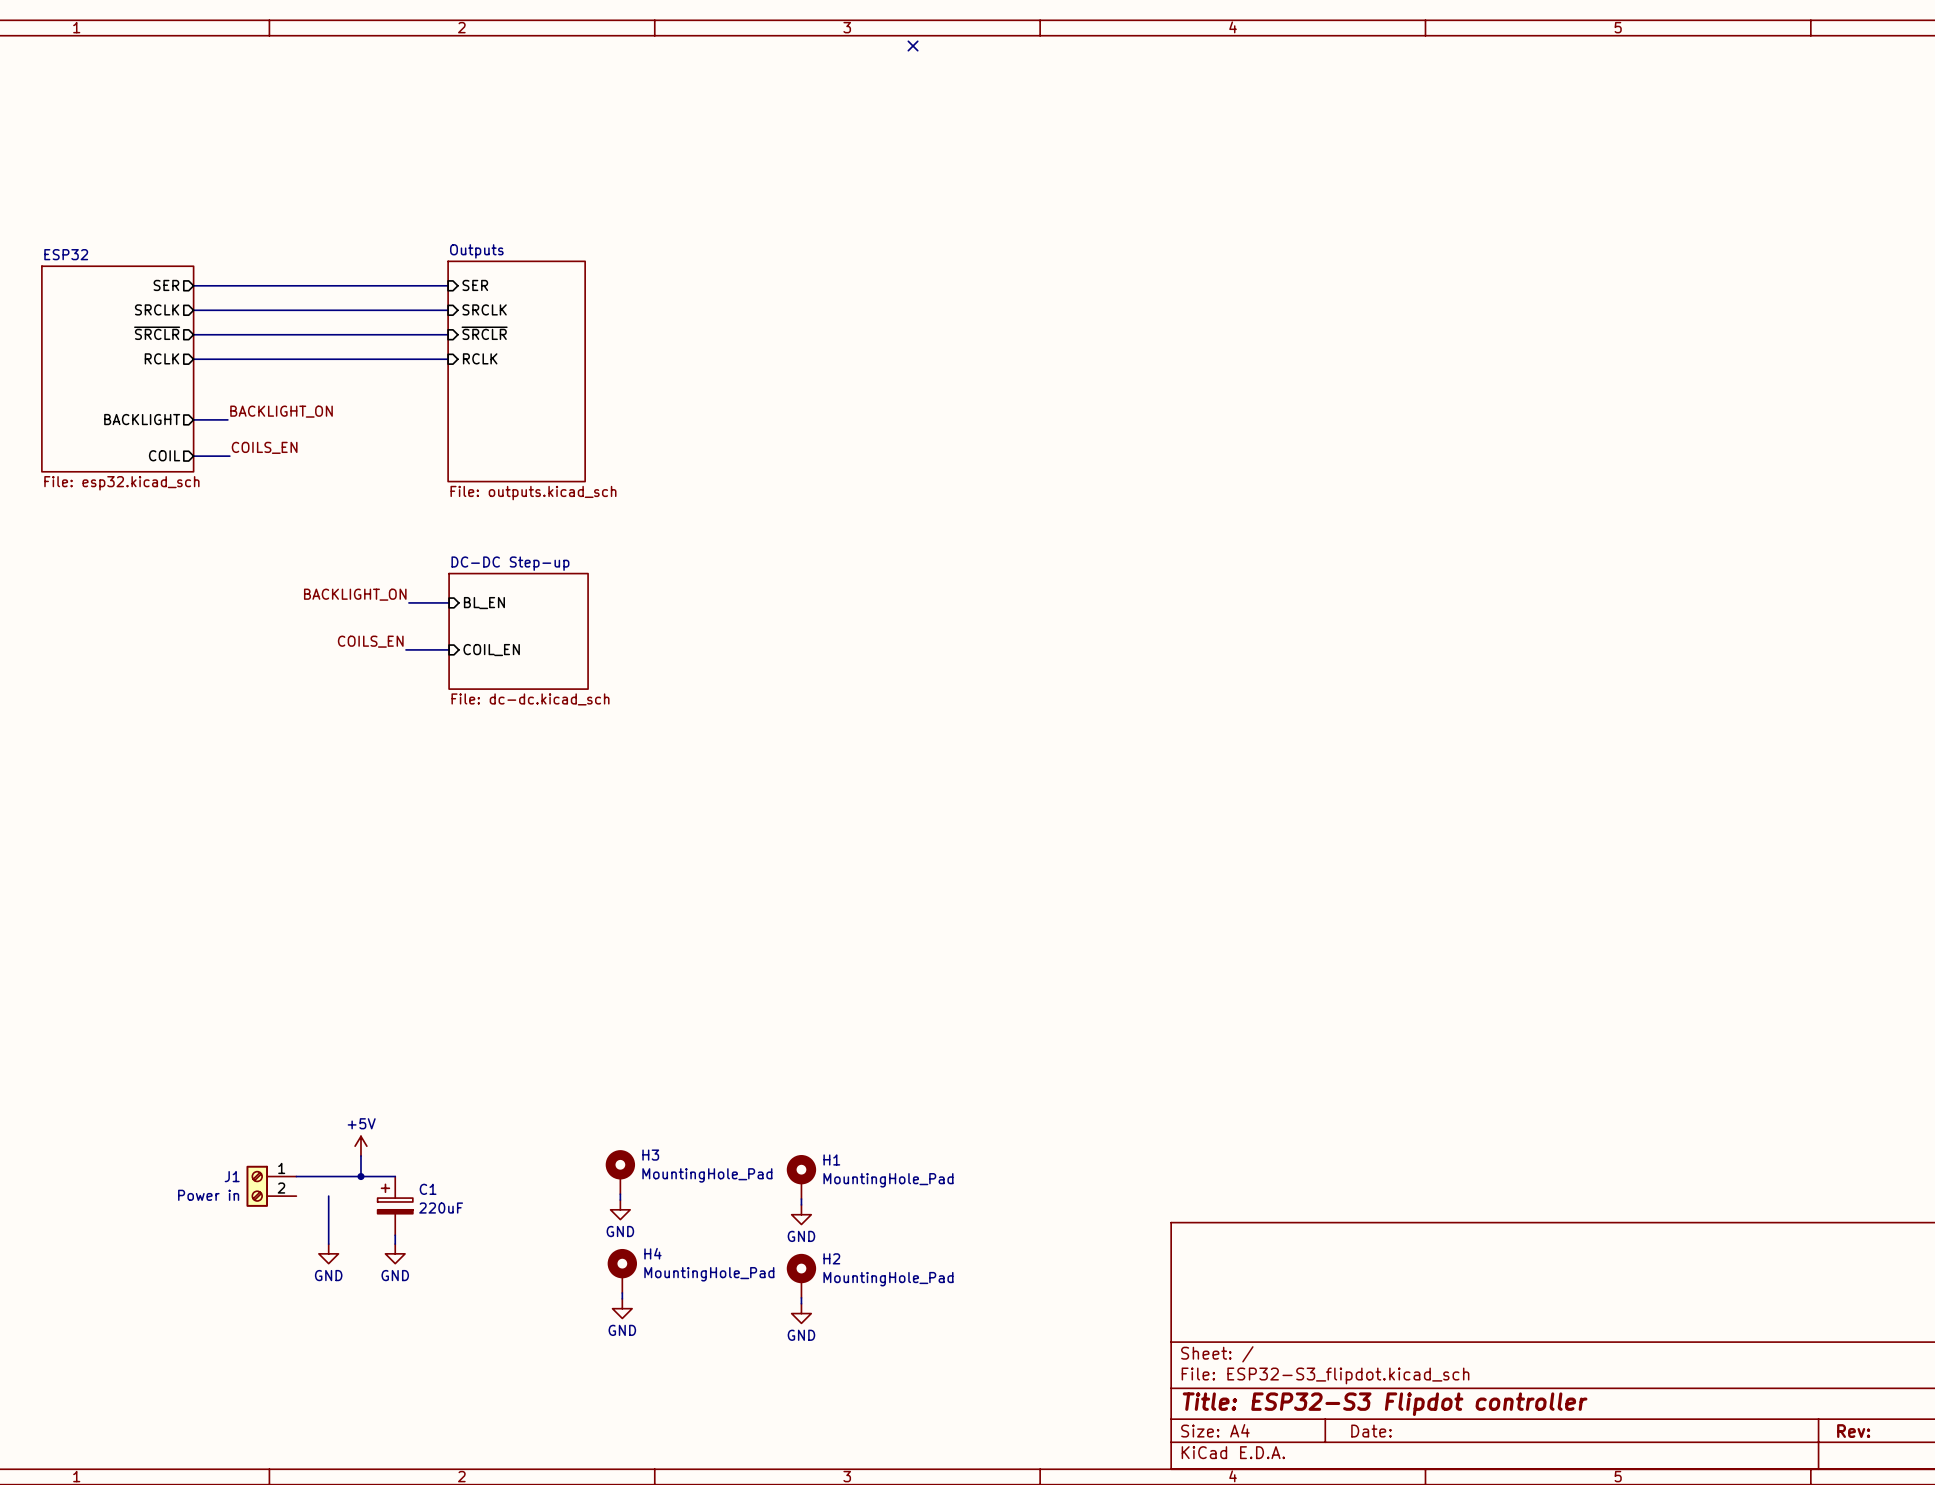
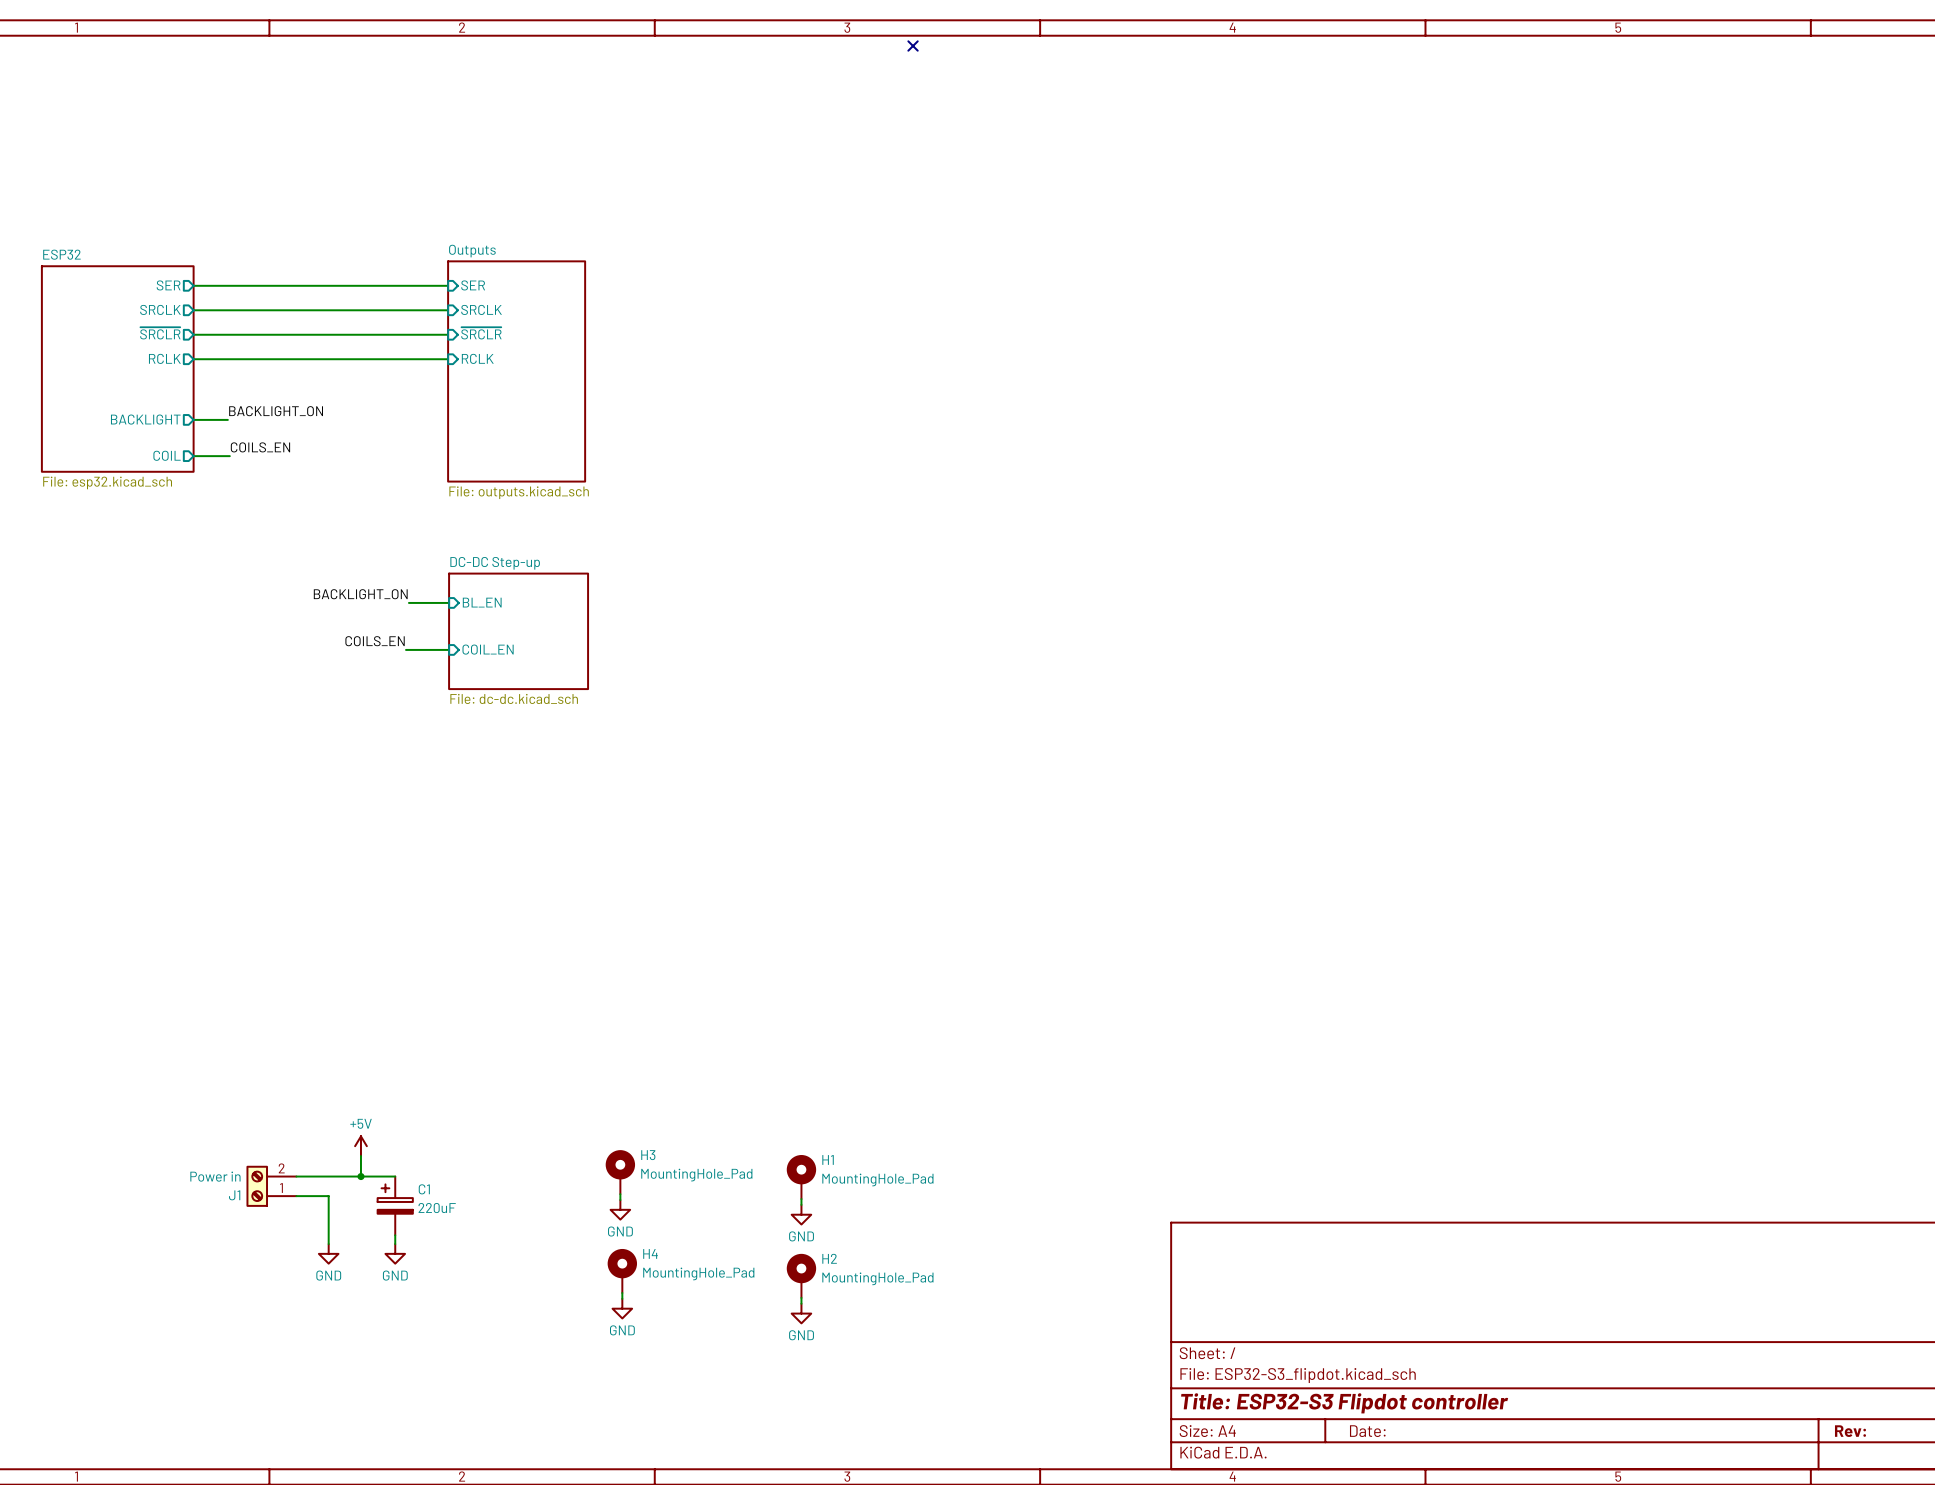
J1 flip: as is (257, 1186) -> up-down (257, 1186)
wire: none -> (296, 1196) (328, 1196)

